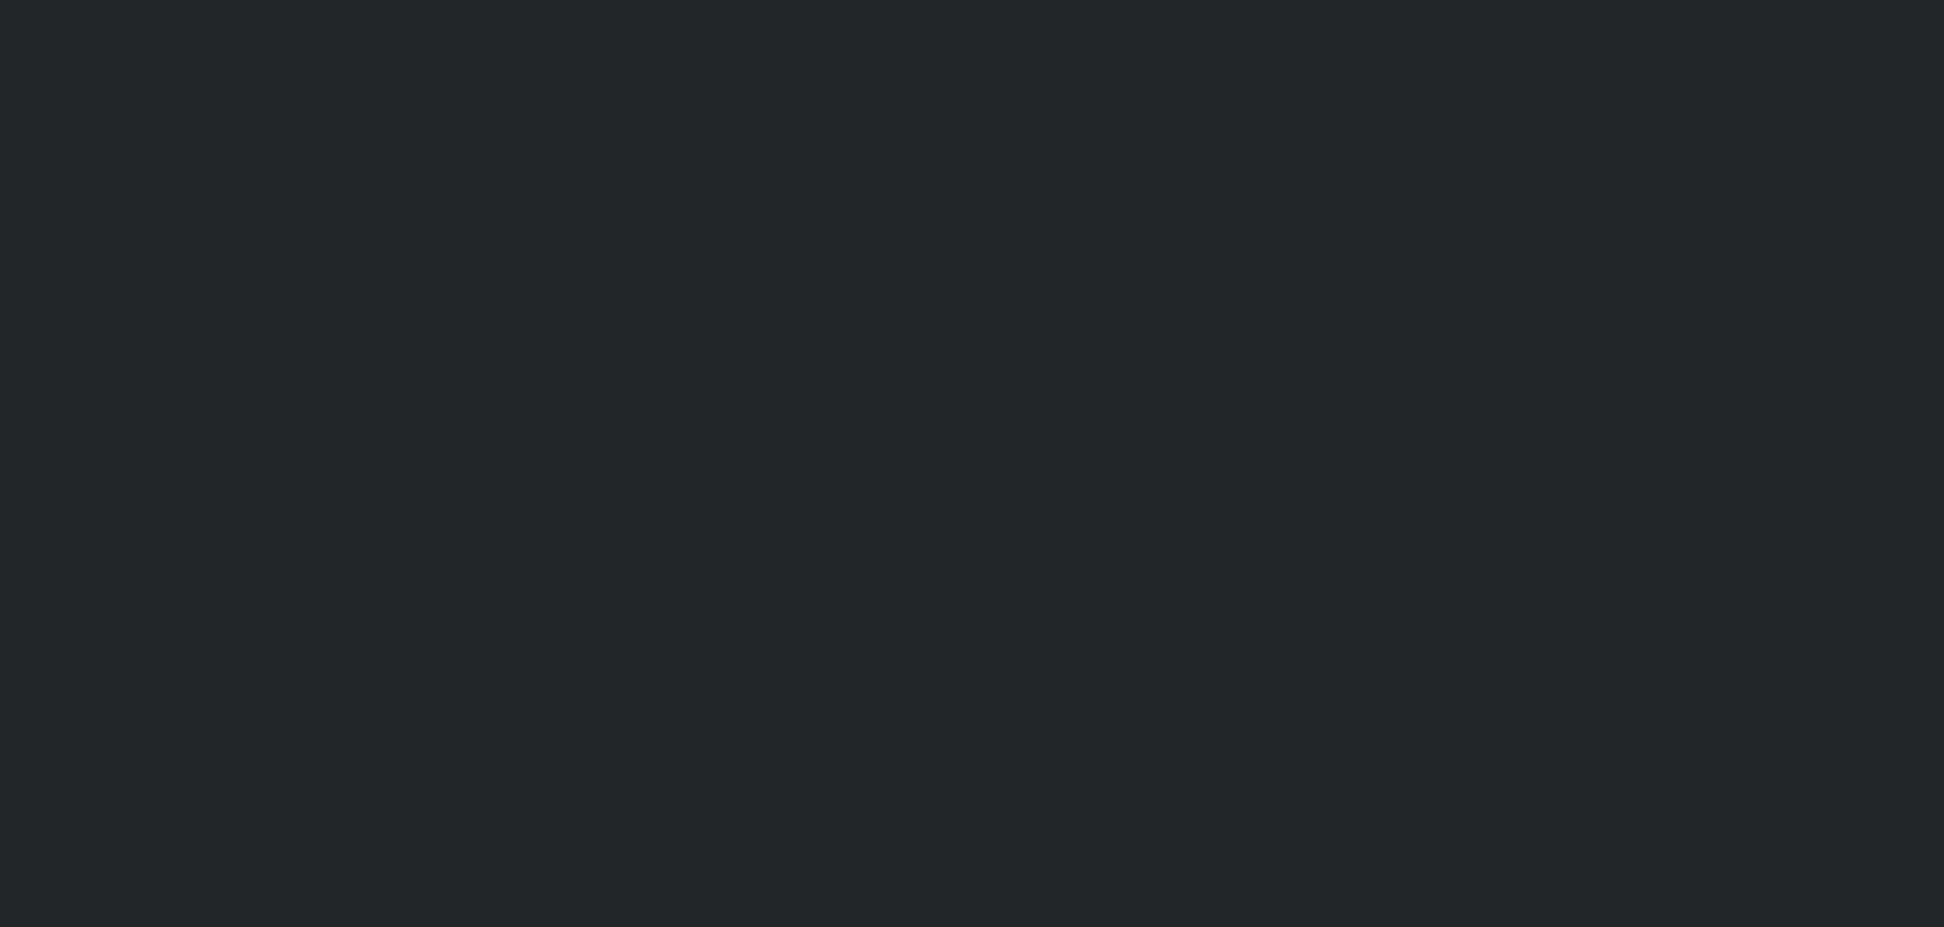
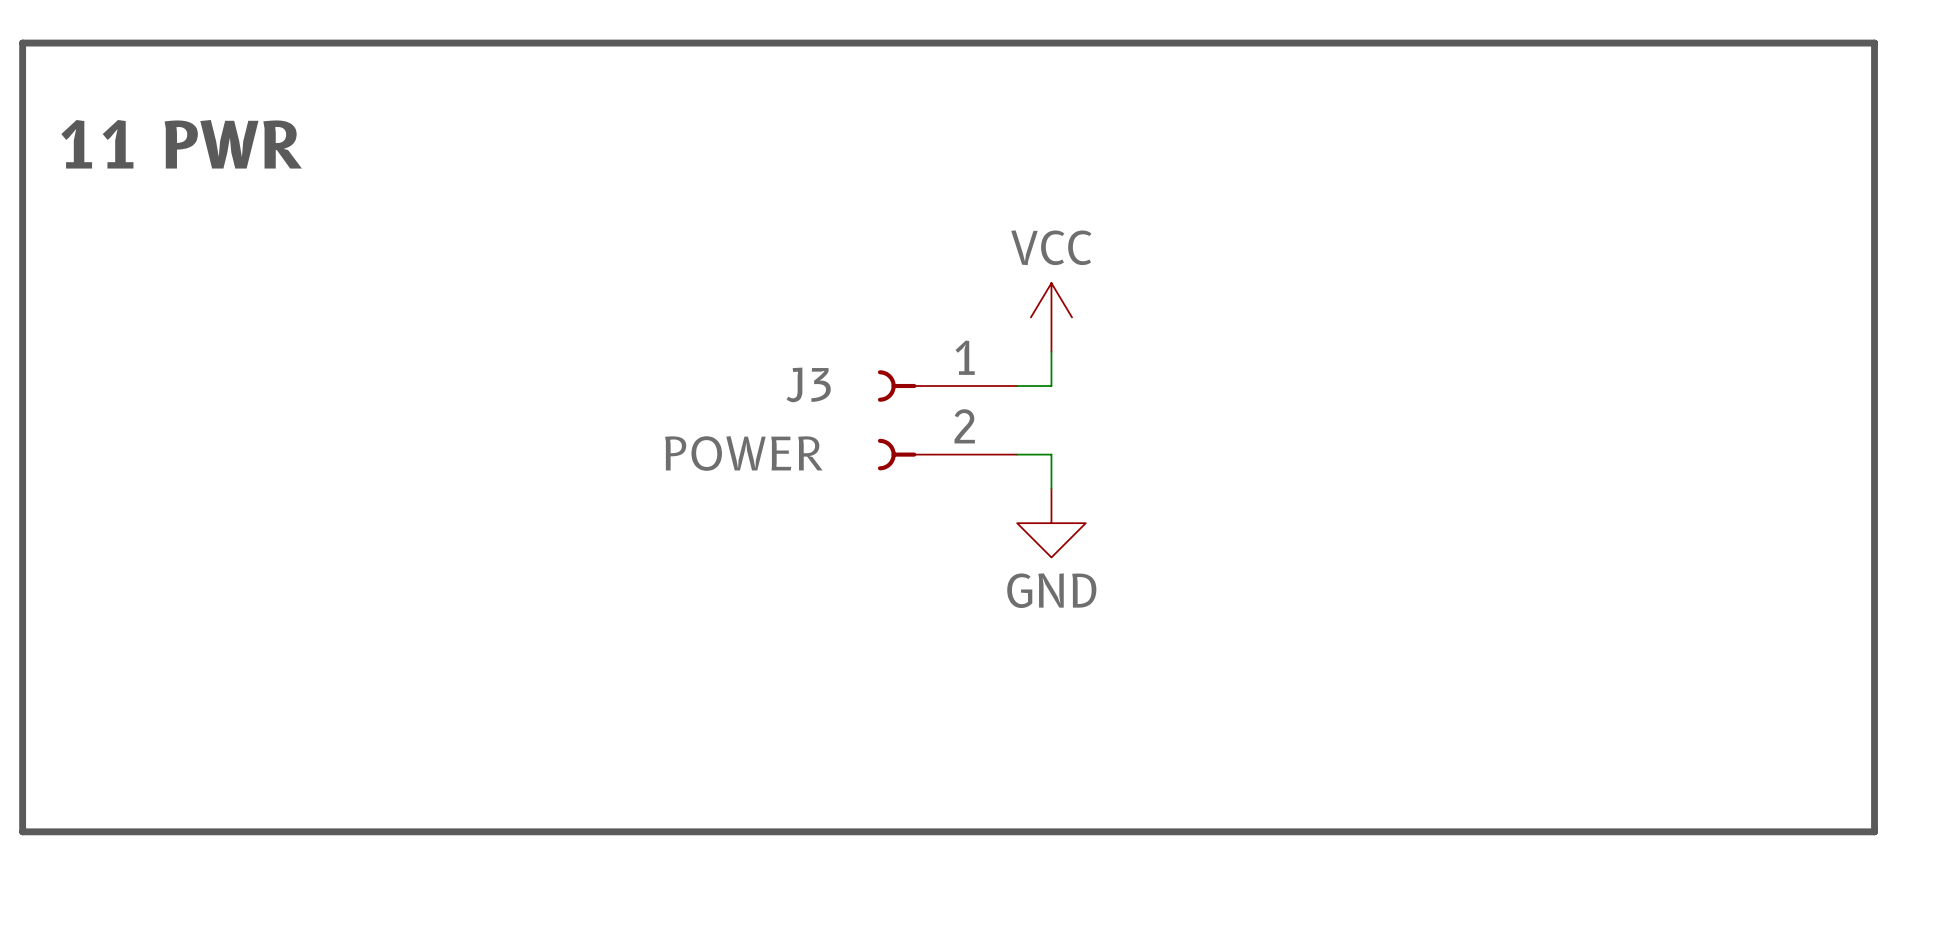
line: none -> (22, 43) (1874, 43) (1874, 831) (22, 831) (22, 43)
text: none -> 11 PWR (181, 144)
power symbol: none -> VCC (1051, 317)
wire: none -> (1051, 351) (1051, 386) (1017, 386)
J3: none -> POWER (947, 420)
wire: none -> (1017, 454) (1051, 454) (1051, 488)
power symbol: none -> GND (1051, 523)

